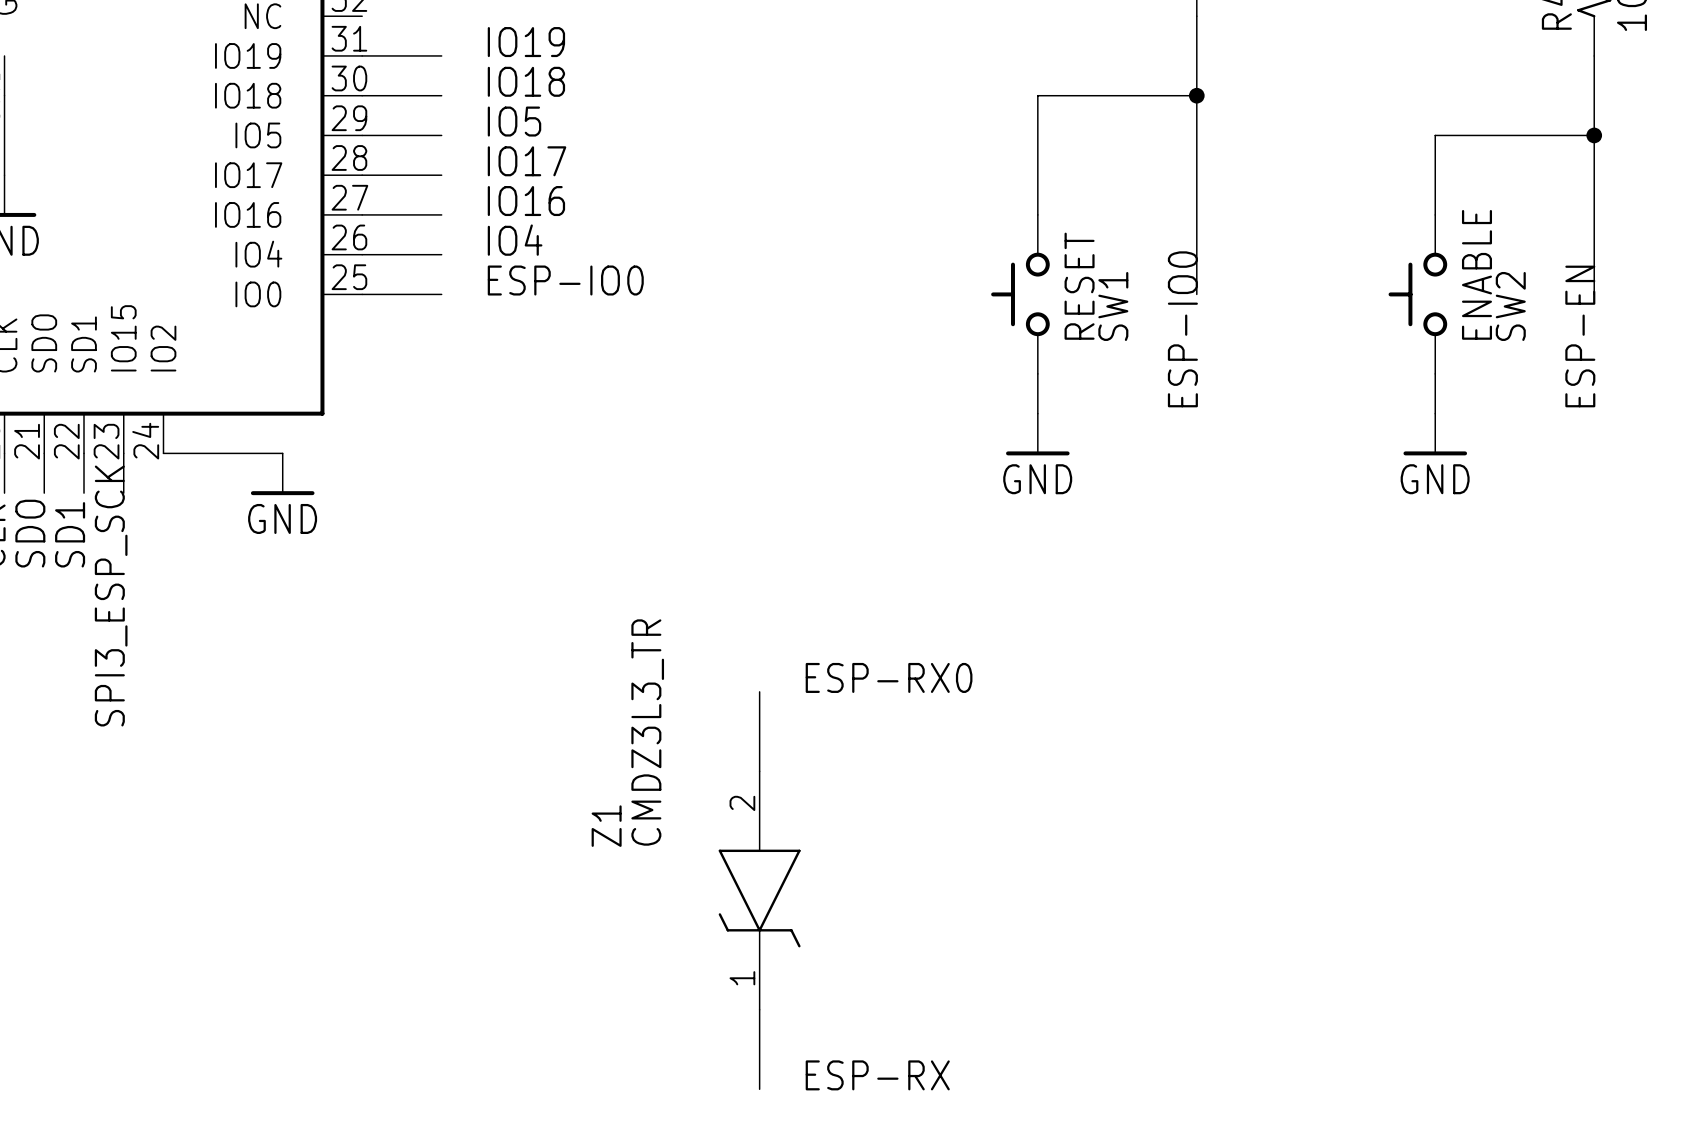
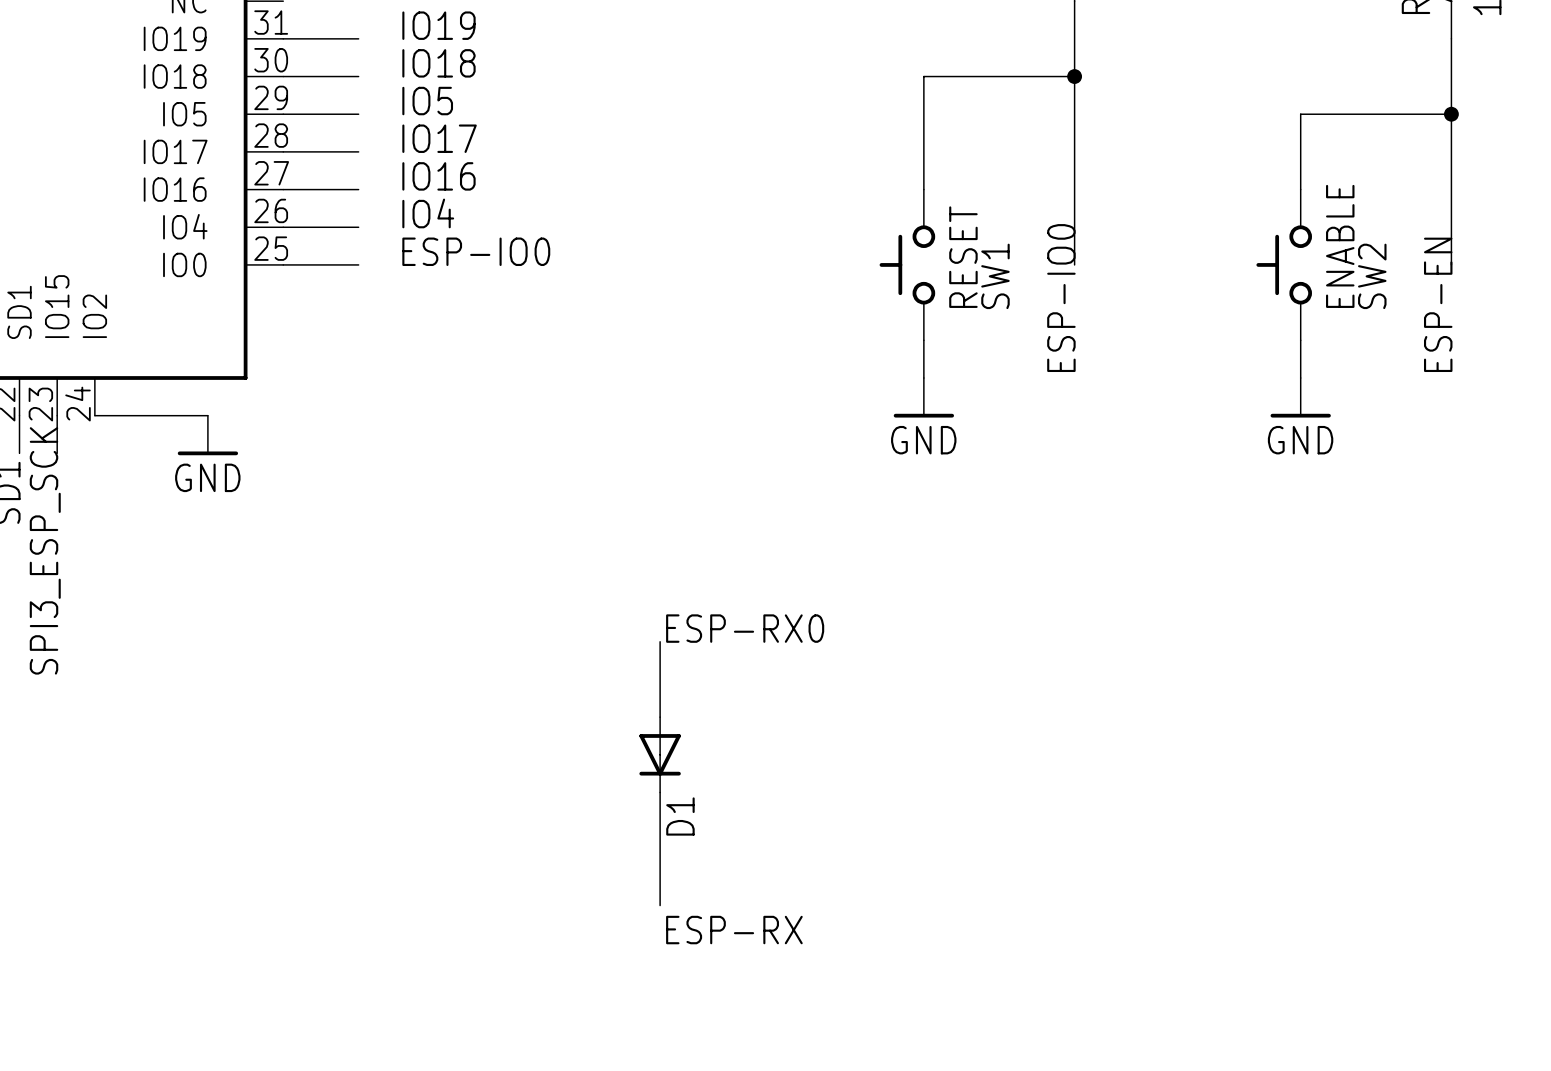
label position: ESP-RX0 (889, 677) -> ESP-RX0 (745, 628)
D1: none -> (660, 754)
wire: none -> (660, 792) (660, 905)
Z1: CMDZ3L3_TR (759, 890) -> none
wire: (759, 1009) (759, 1089) -> none
label position: ESP-RX (877, 1075) -> ESP-RX (734, 930)

